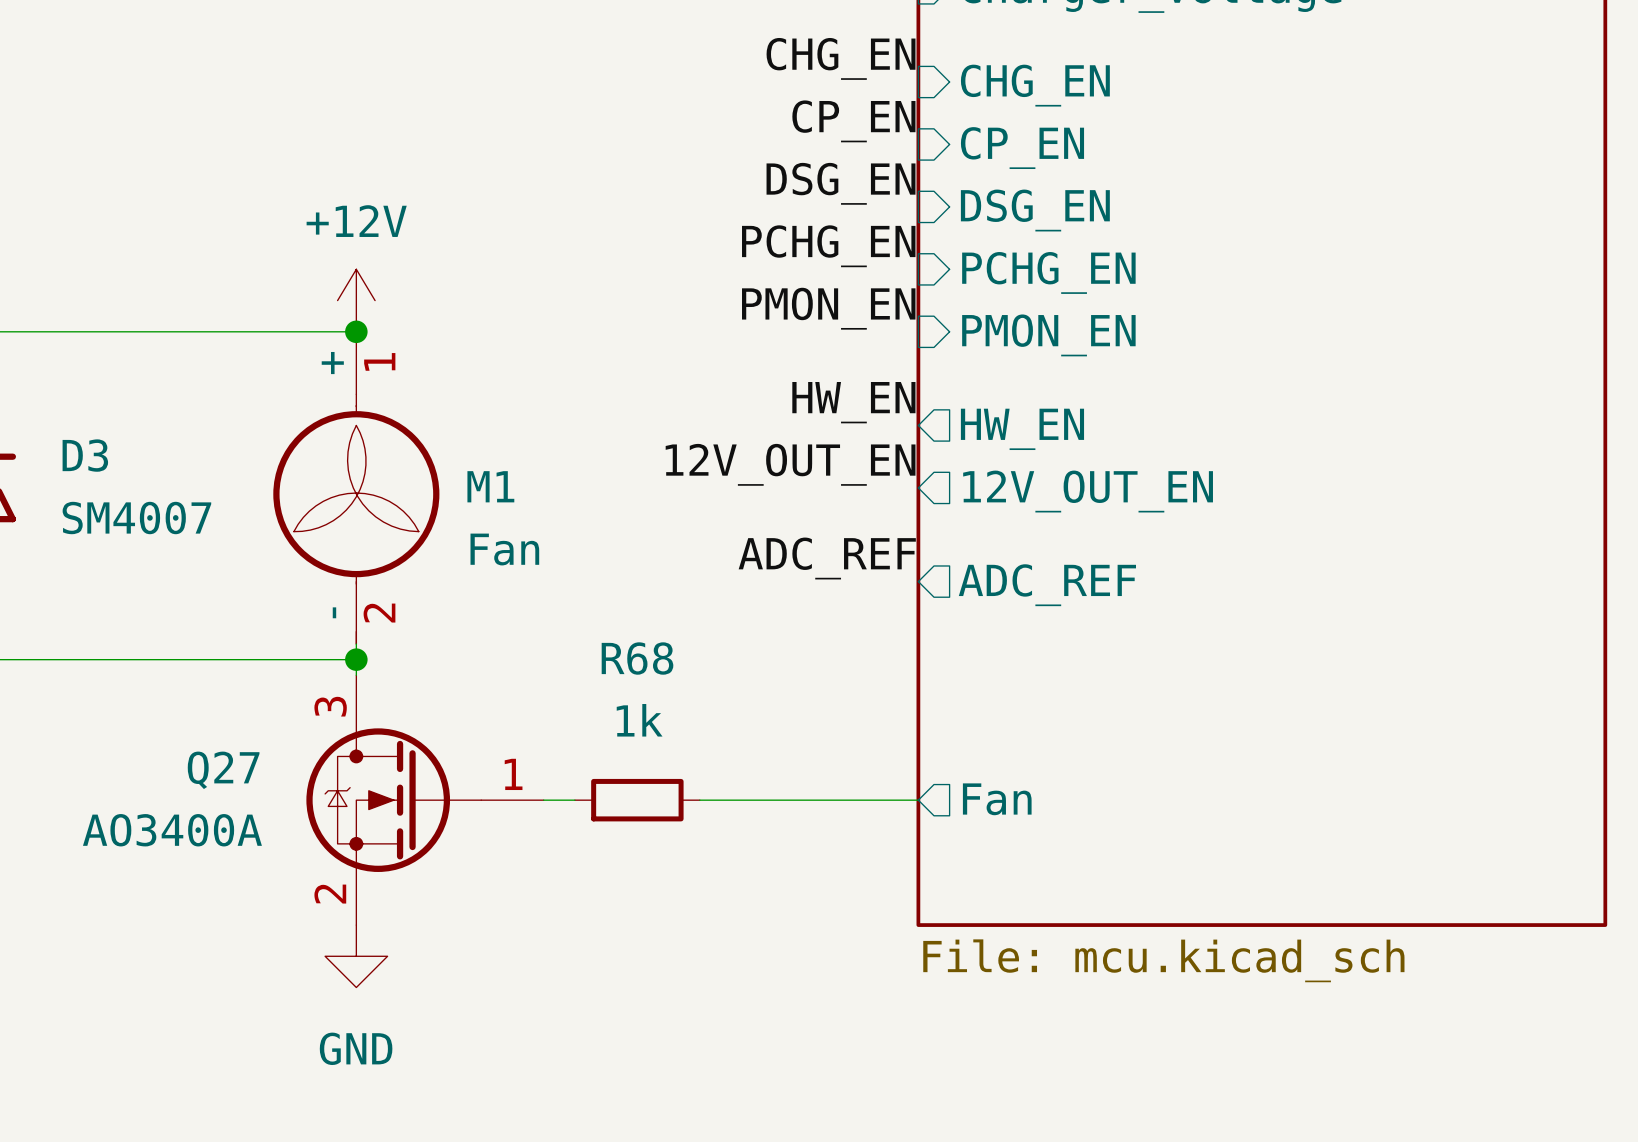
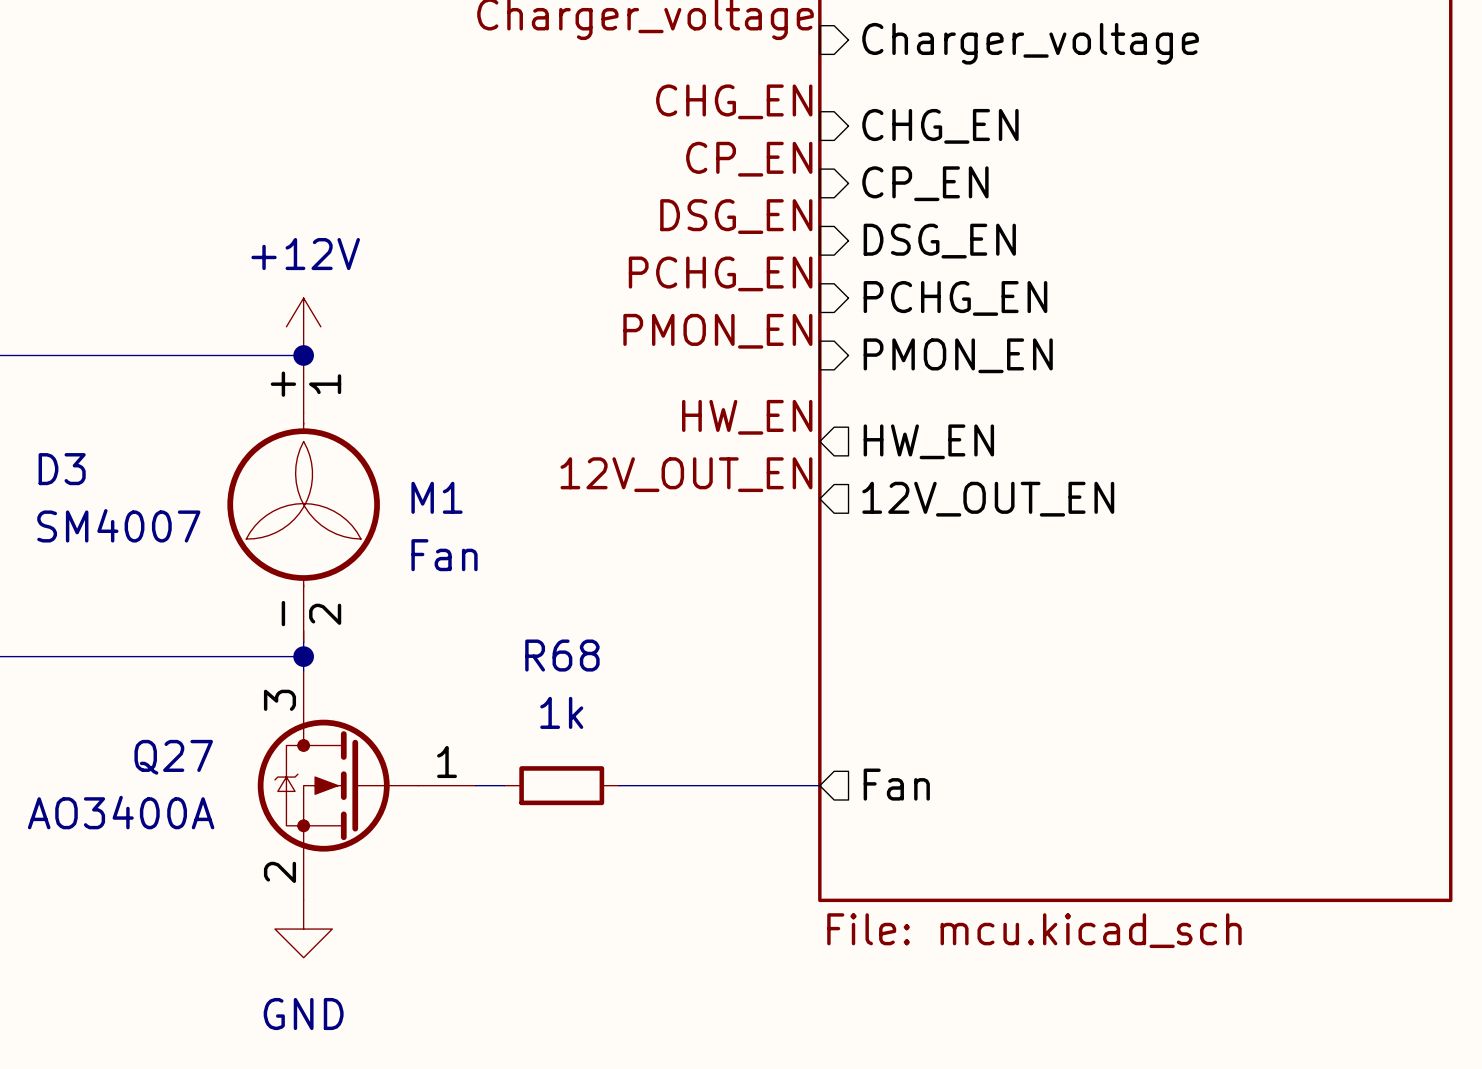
label: ADC_REF (827, 558) -> none
sheet pin: ADC_REF (1047, 585) -> none

